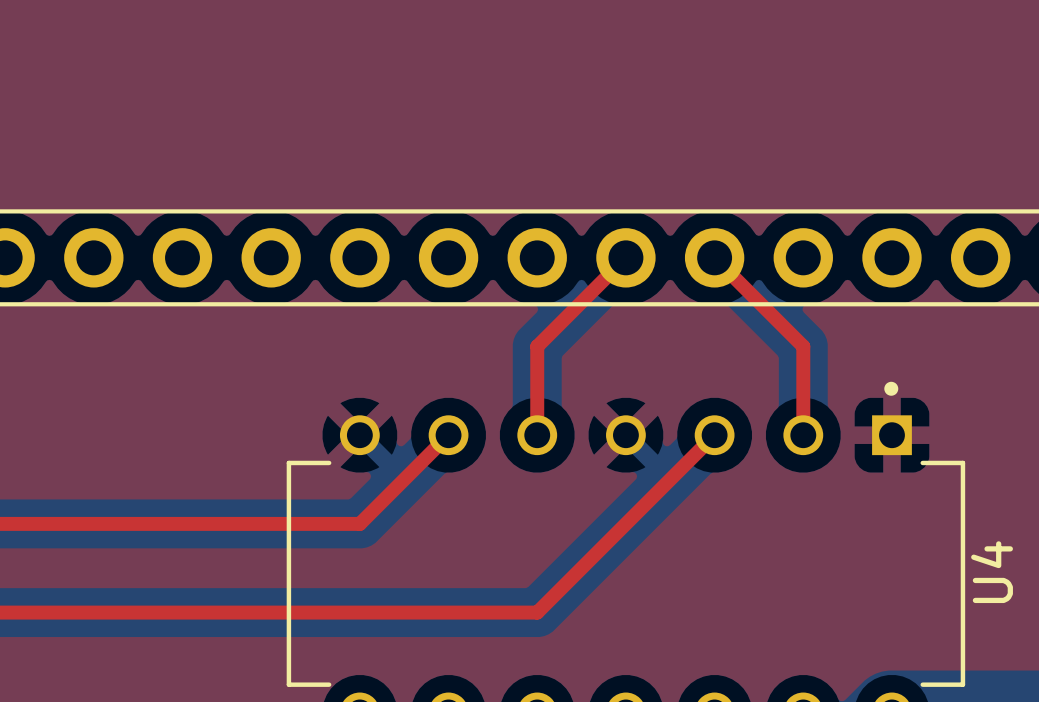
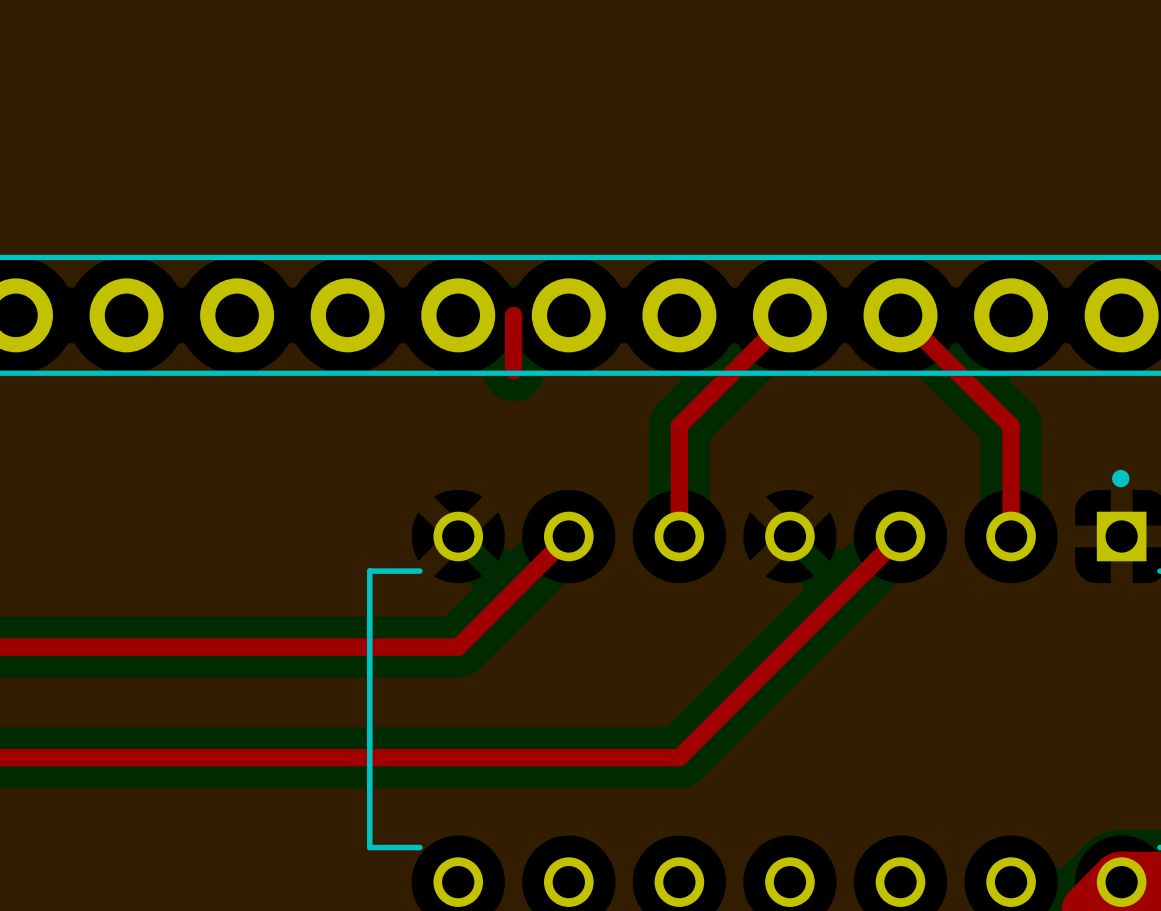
top track: none -> (513, 315) (513, 370)

